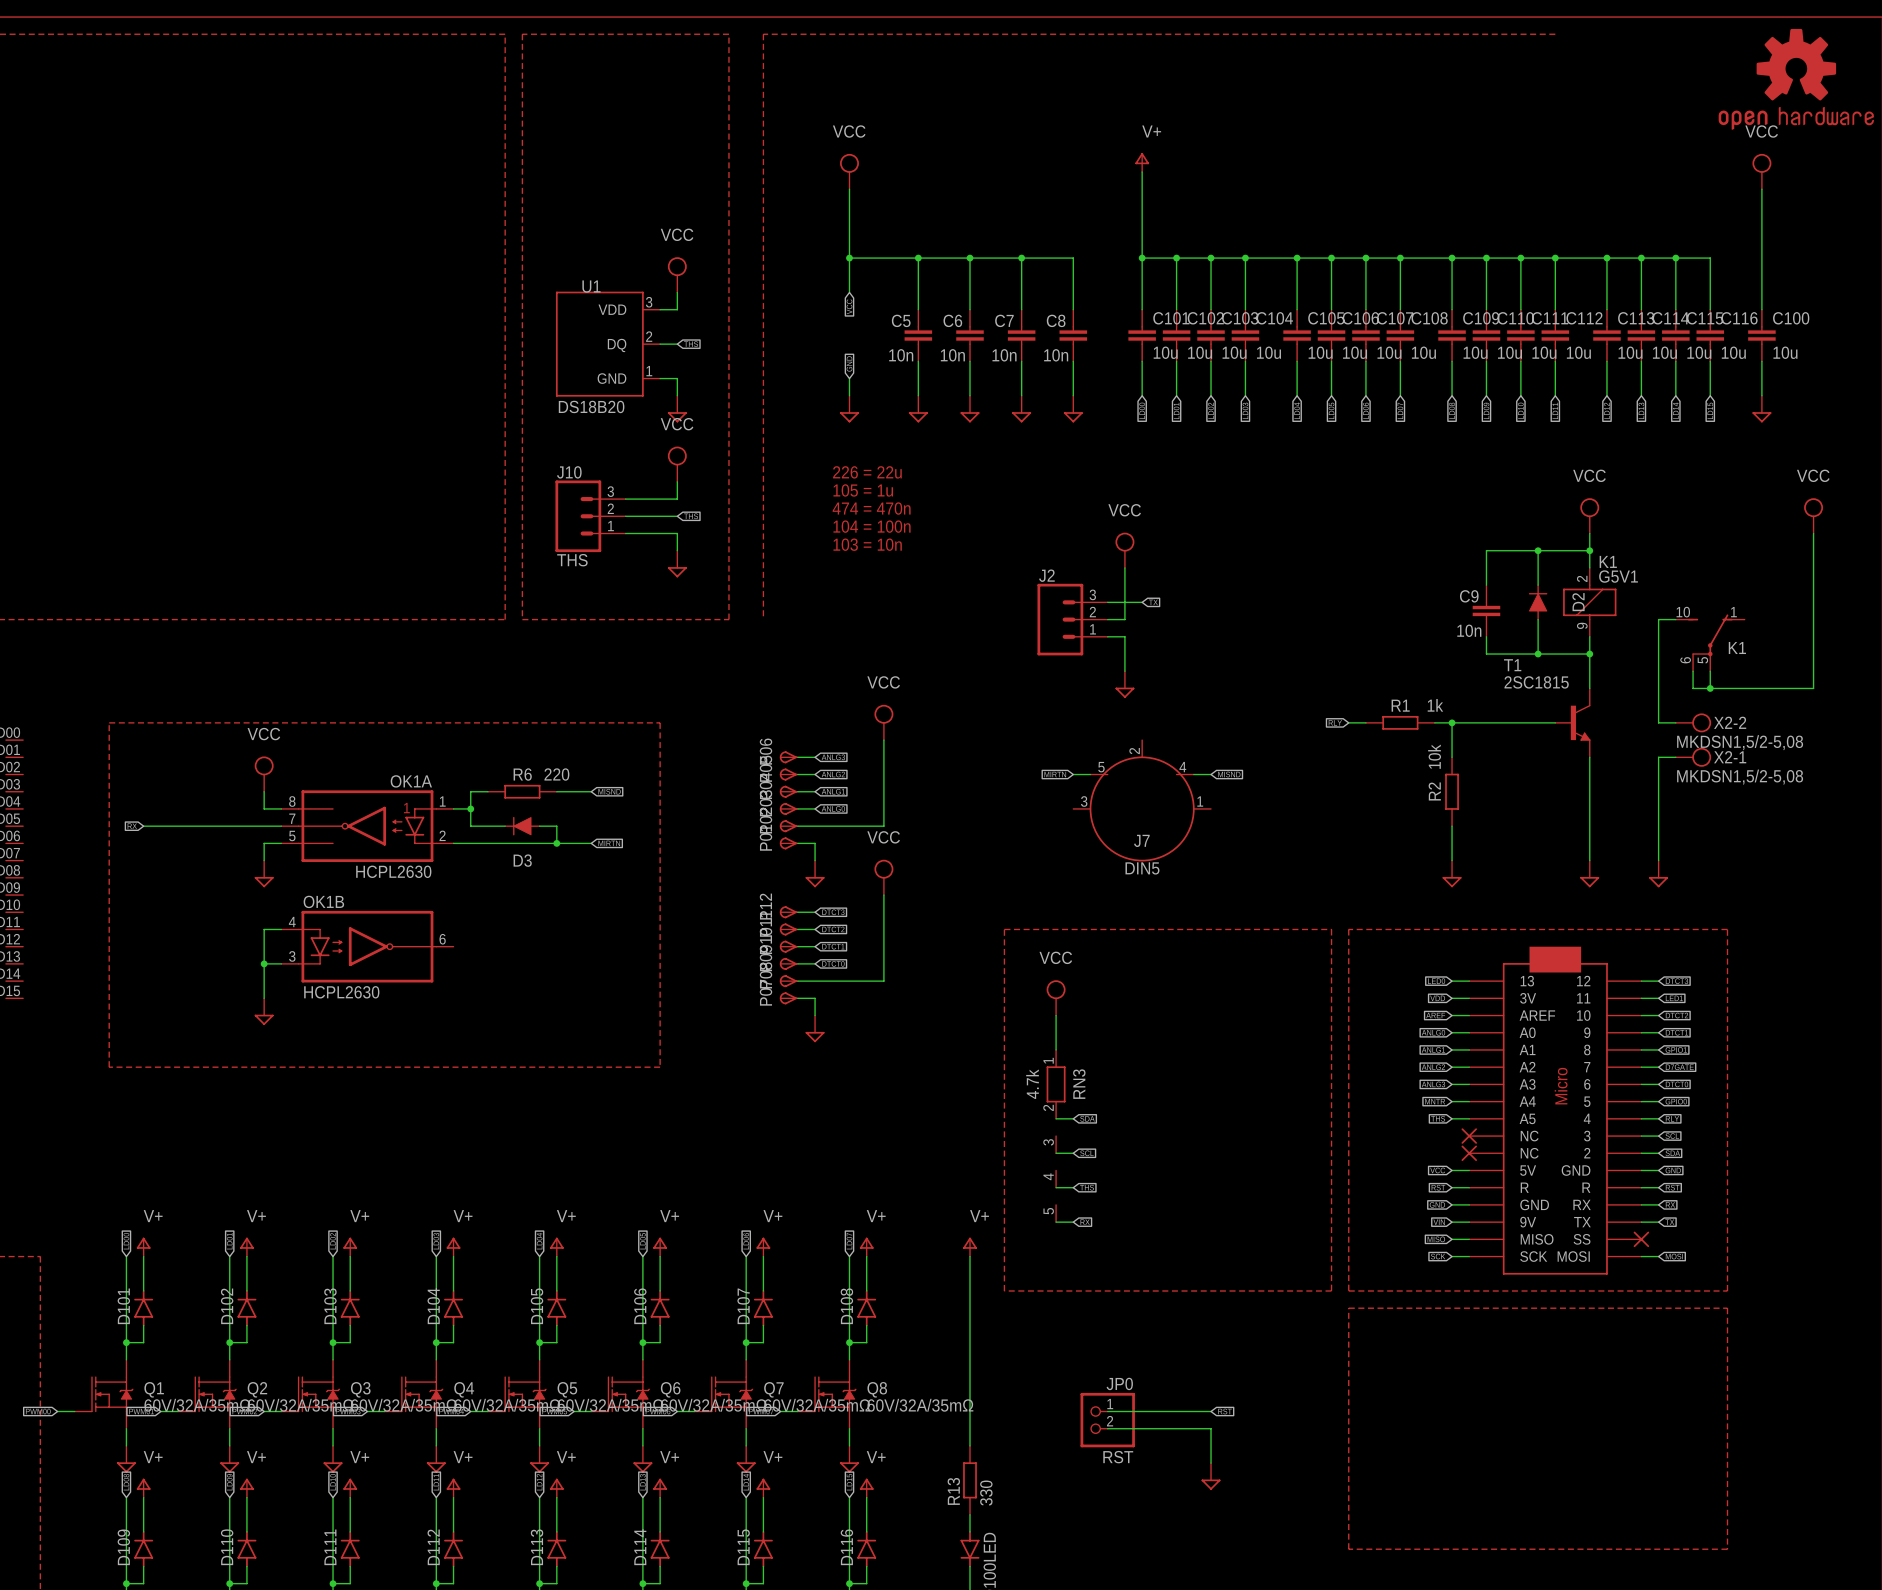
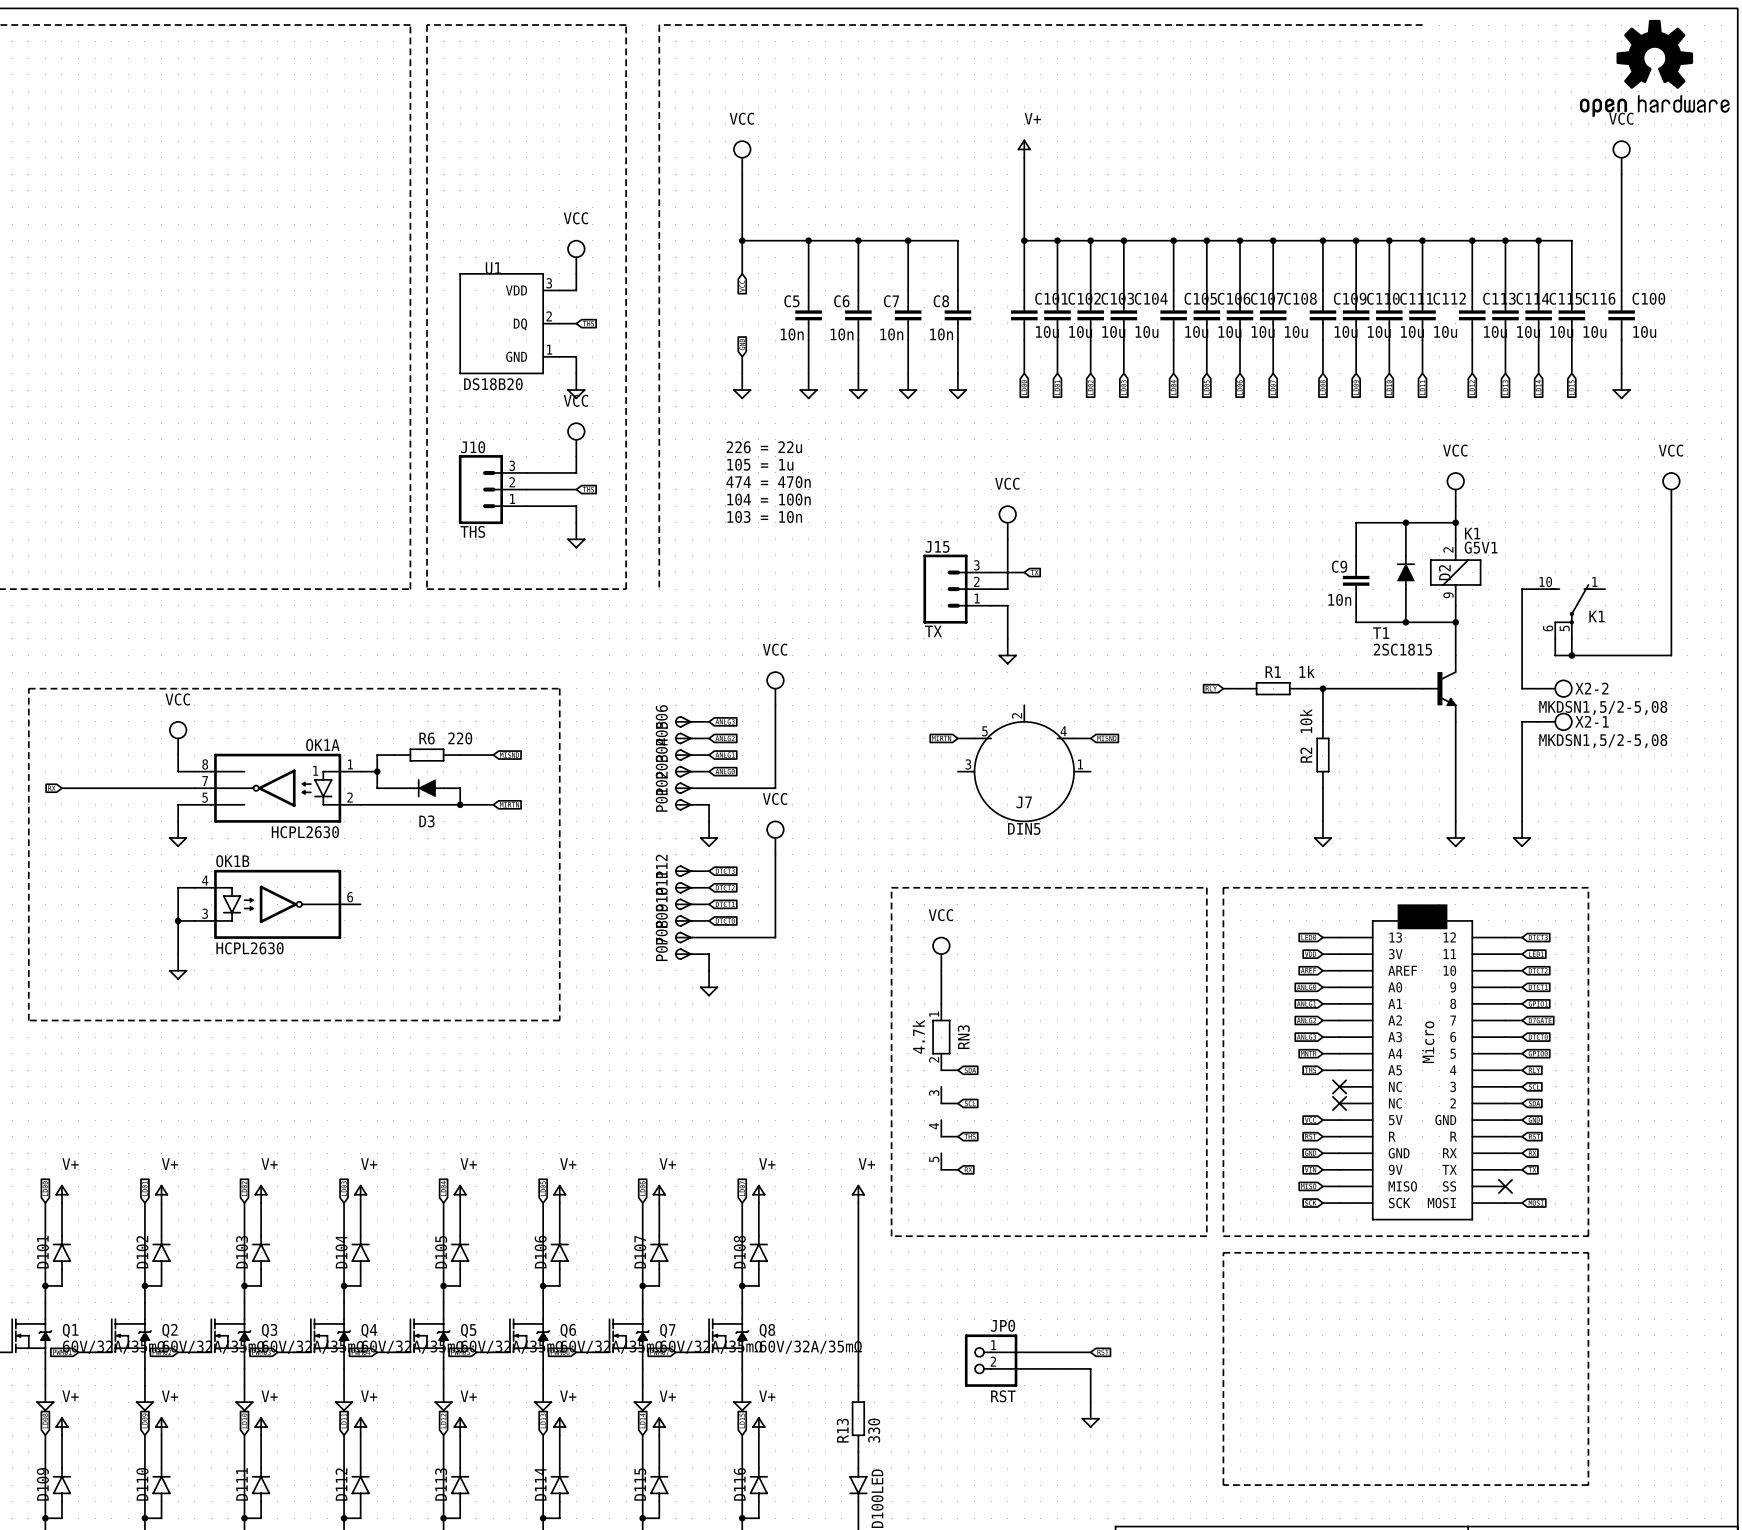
J2 name: J2 (1046, 575) -> J15 (937, 546)
J2 value: none -> TX (933, 631)

